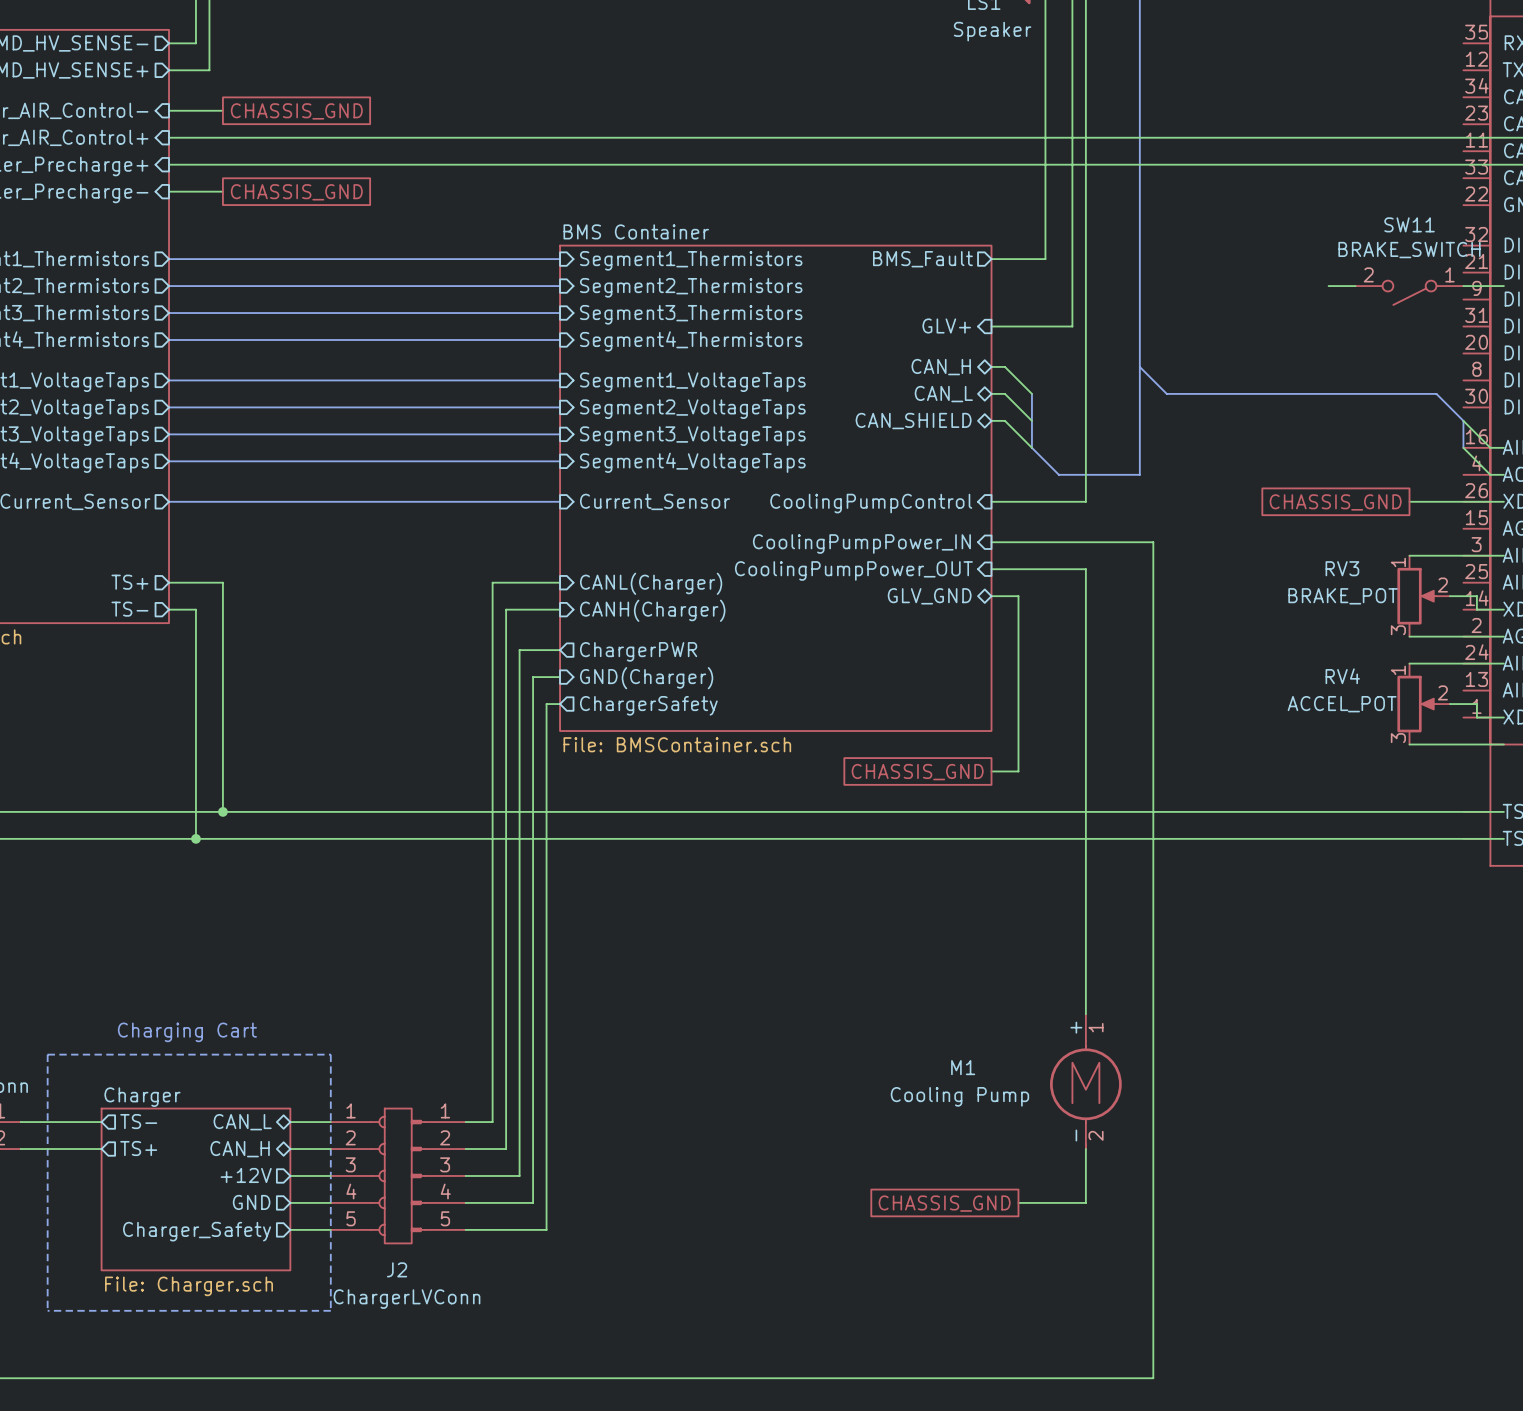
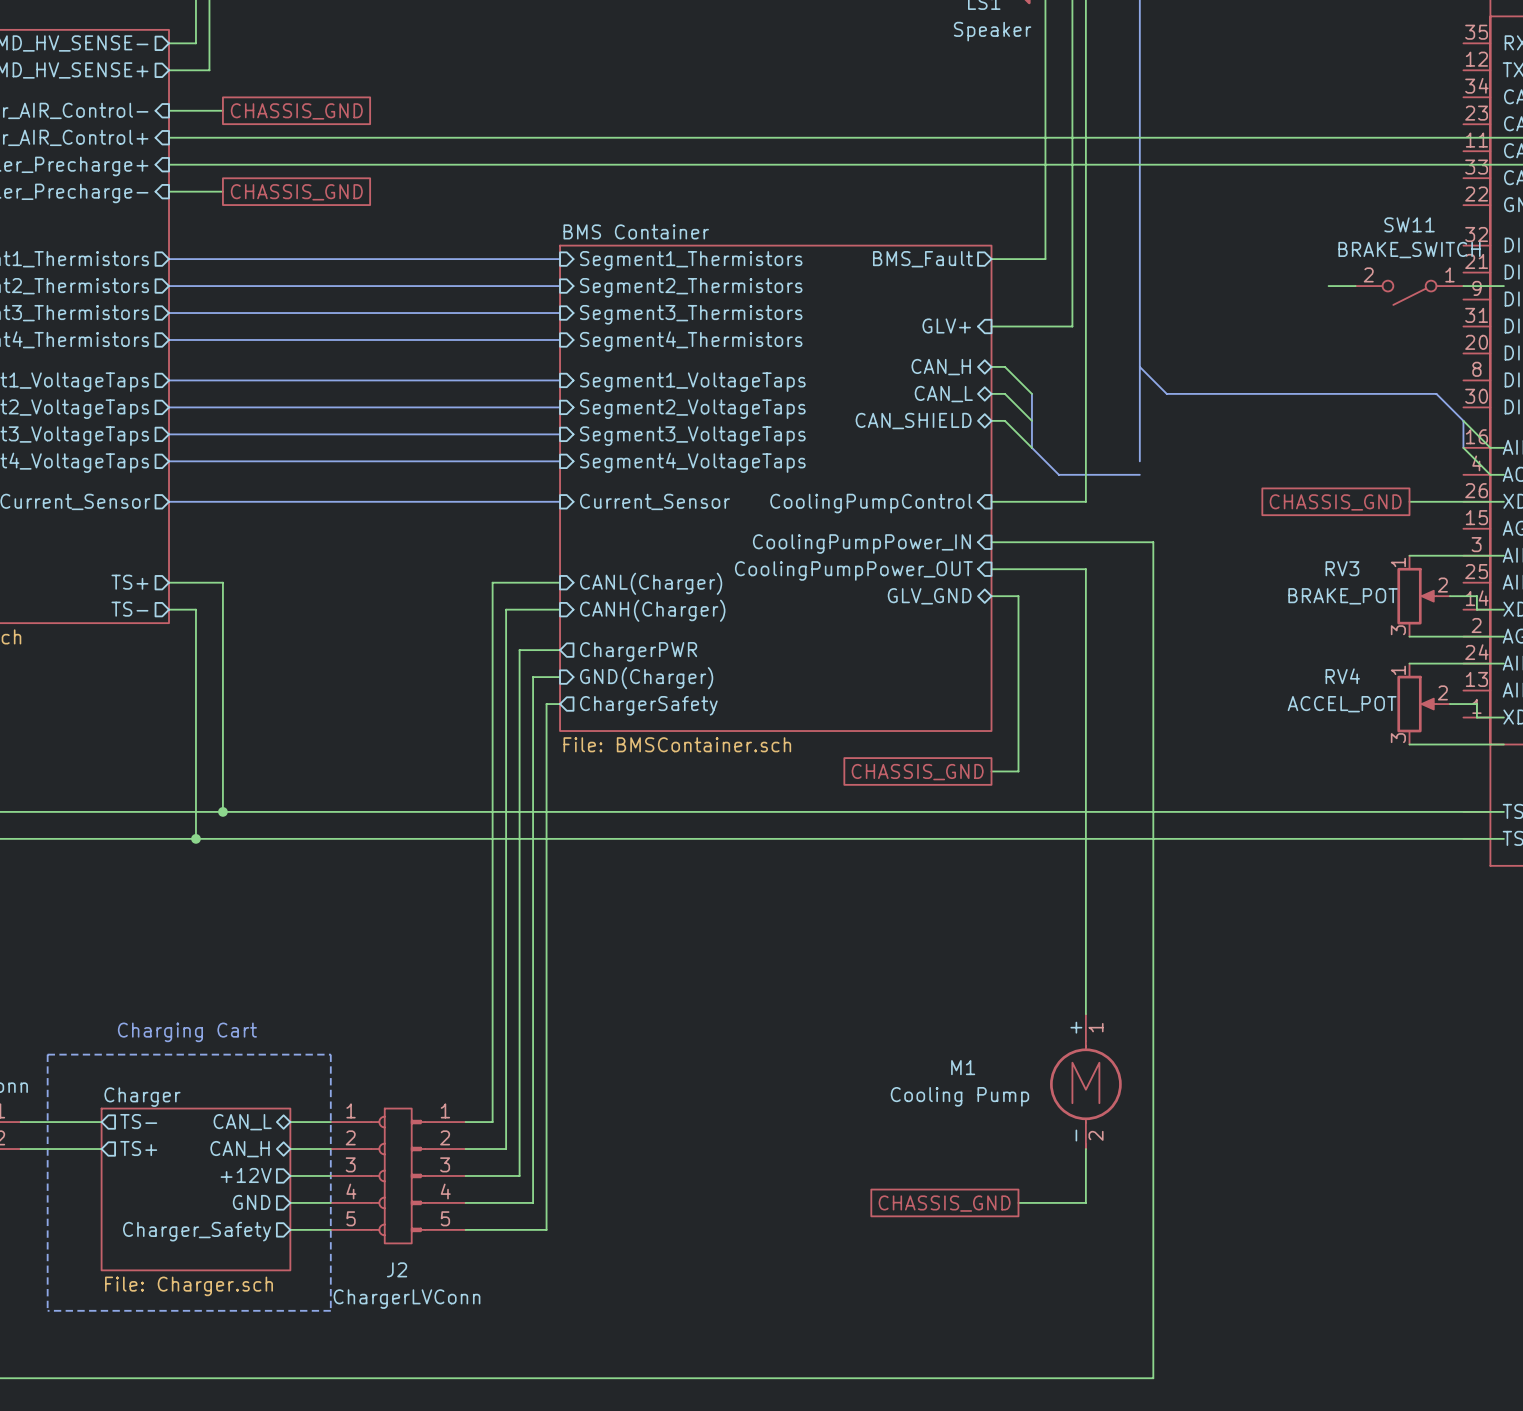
bus: (1139, 461) (1139, 474) -> none

